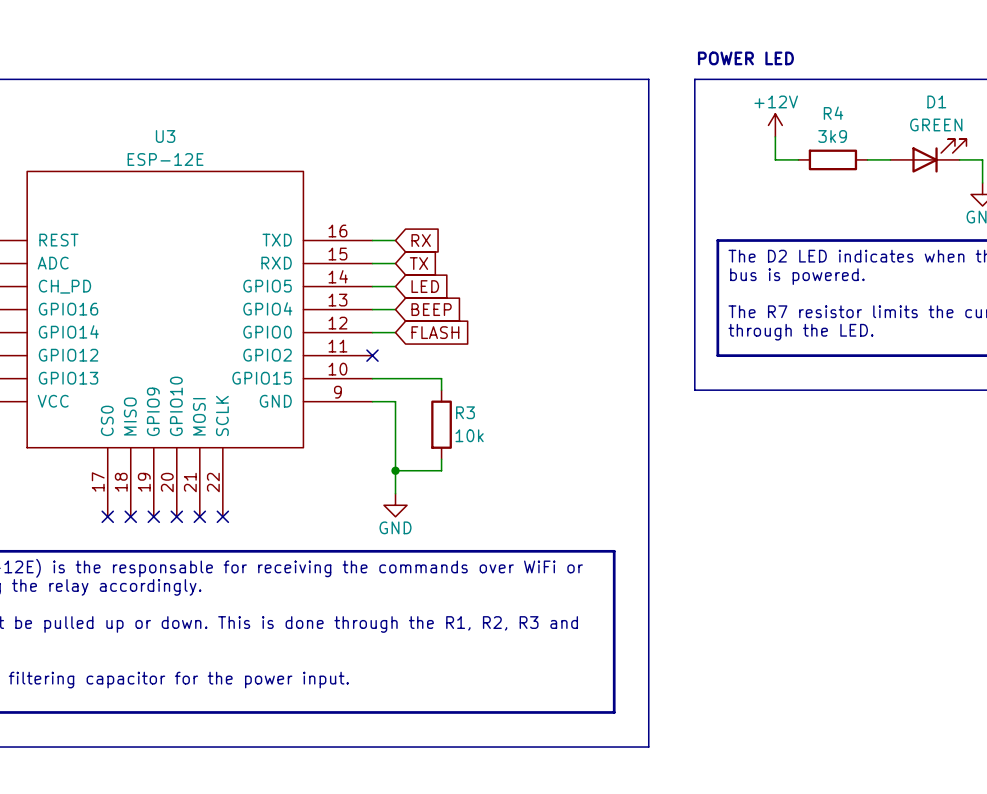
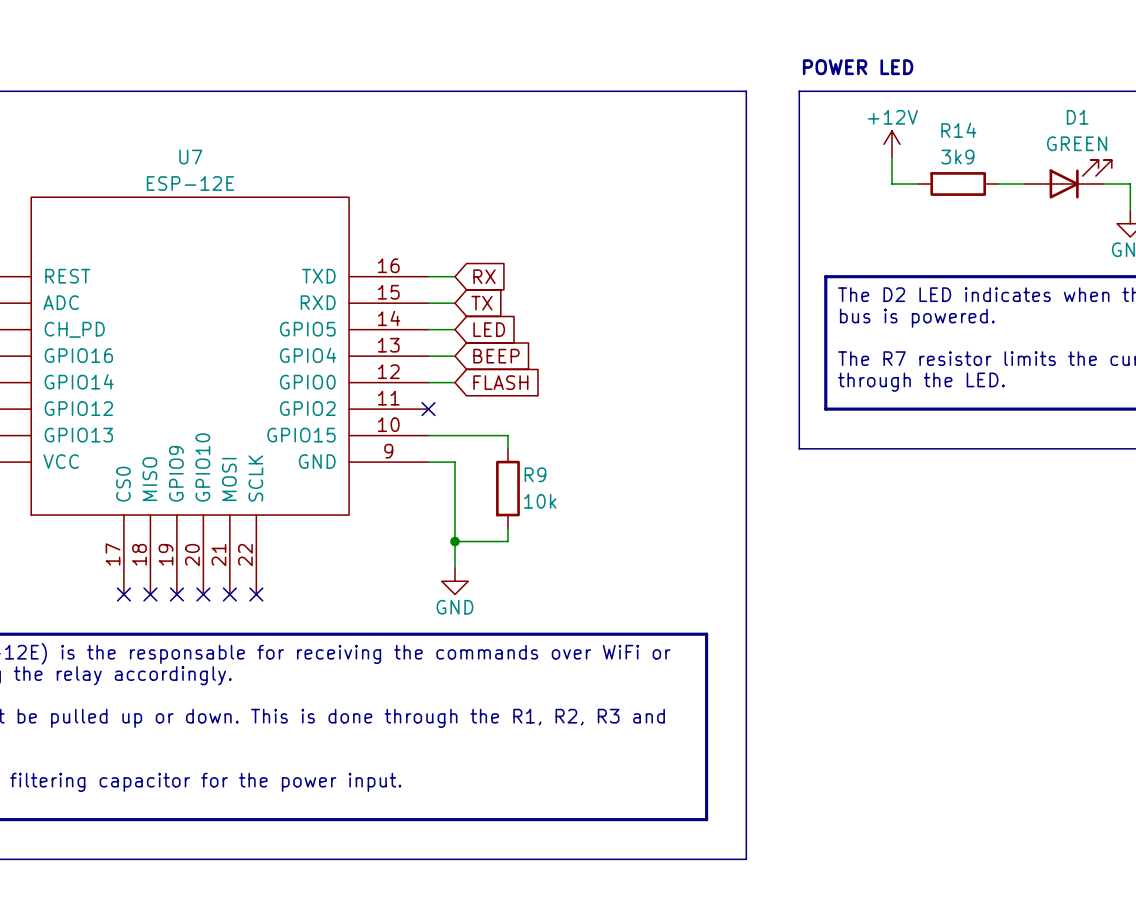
R4 name: R4 (833, 113) -> R14 (958, 130)
U3 name: U3 (165, 136) -> U7 (190, 157)
R3 name: R3 (465, 412) -> R9 (535, 474)

